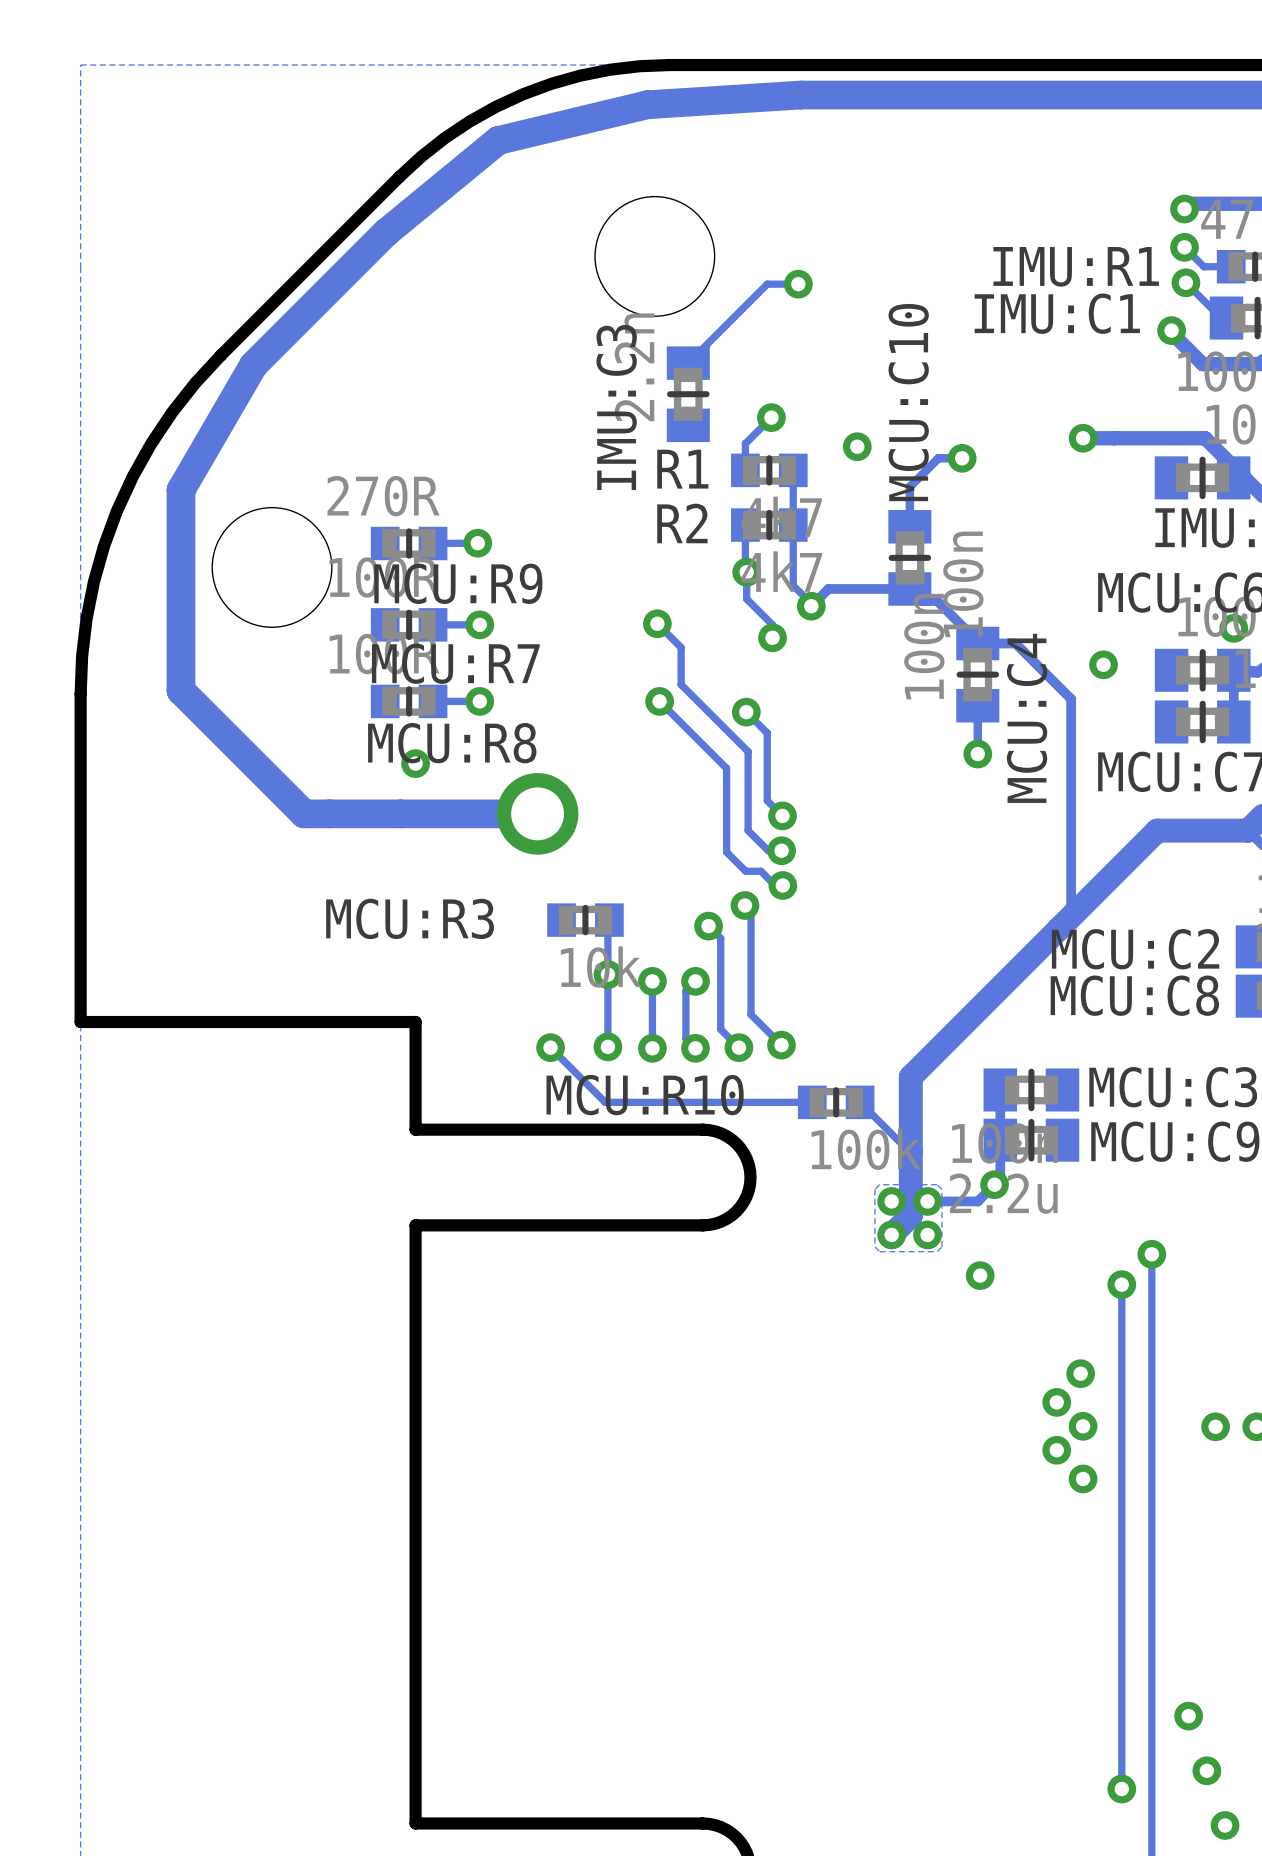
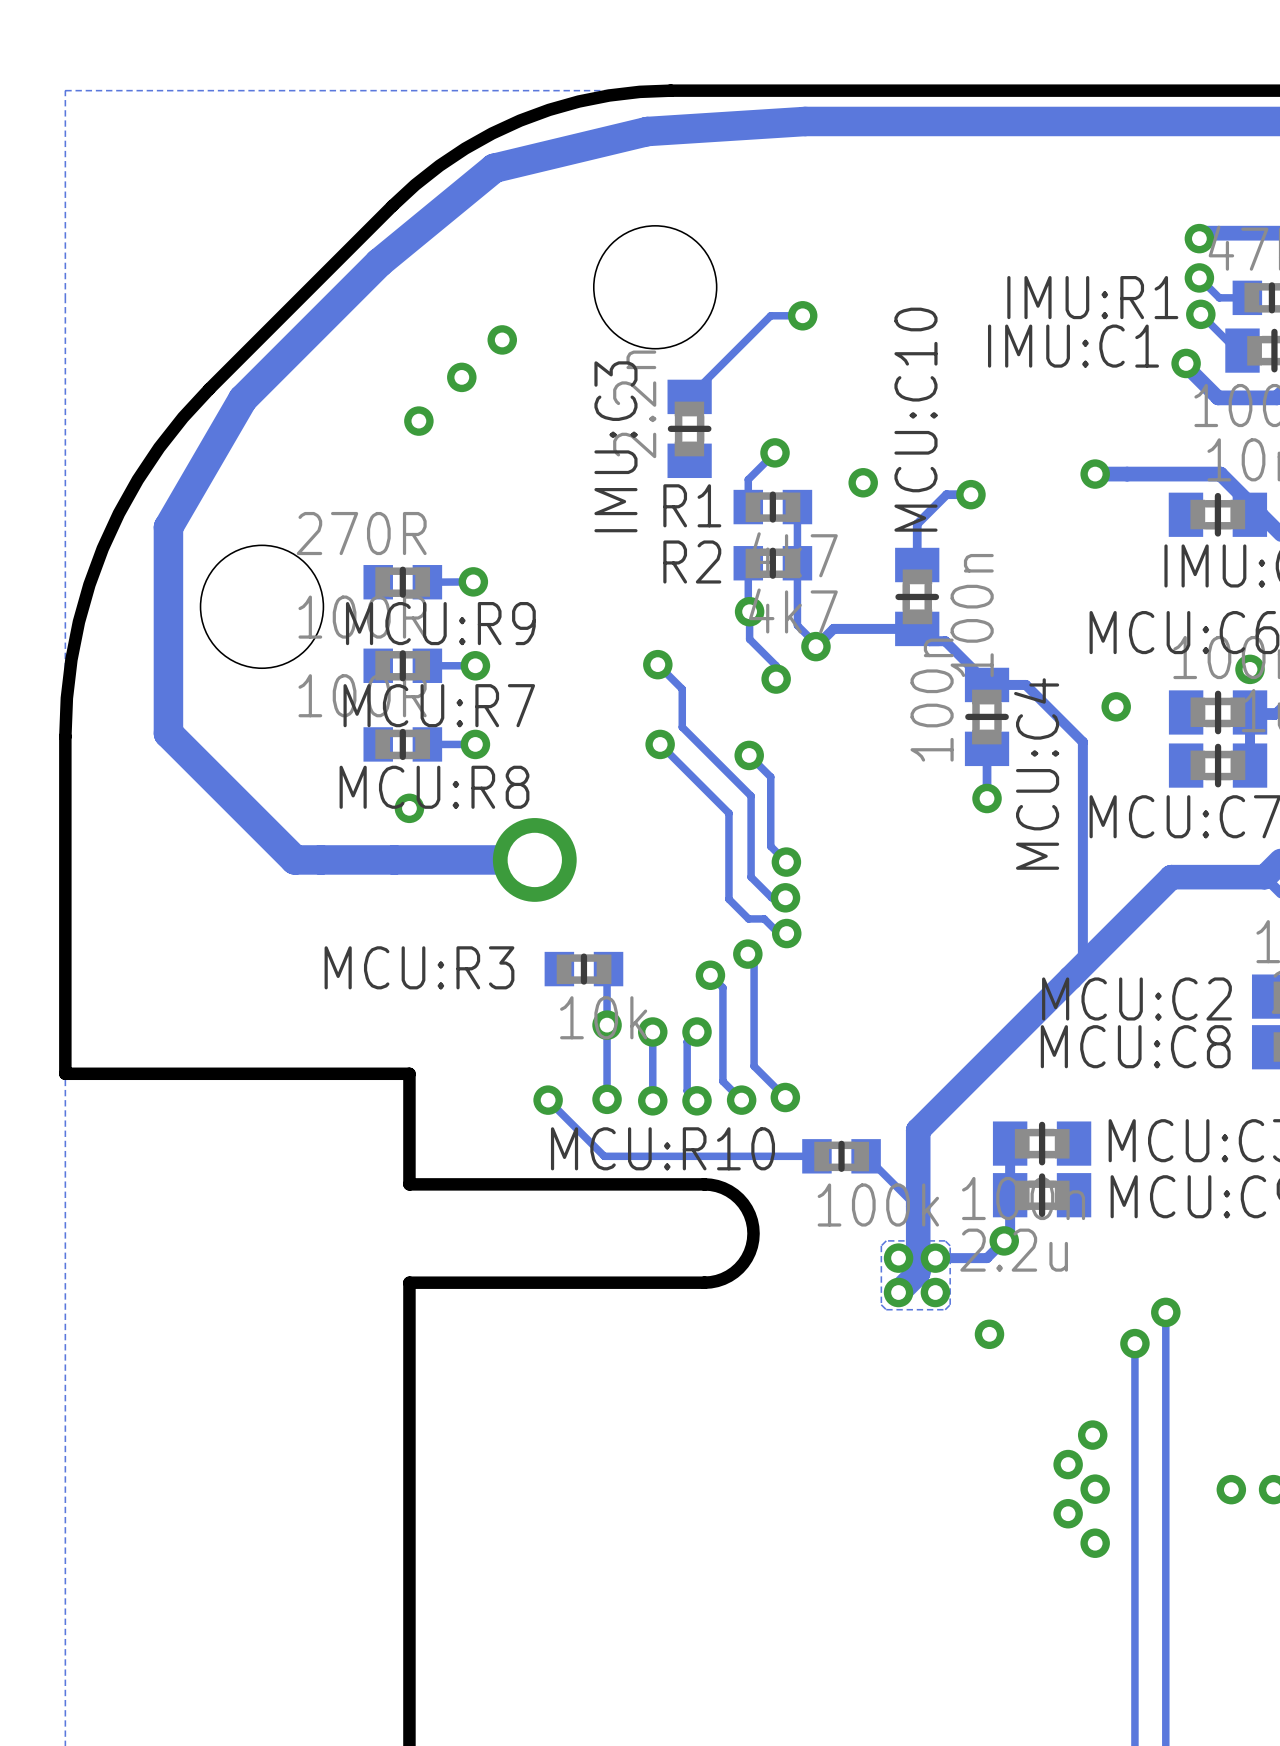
via: none -> (502, 339)
via: none -> (461, 377)
via: none -> (418, 421)

